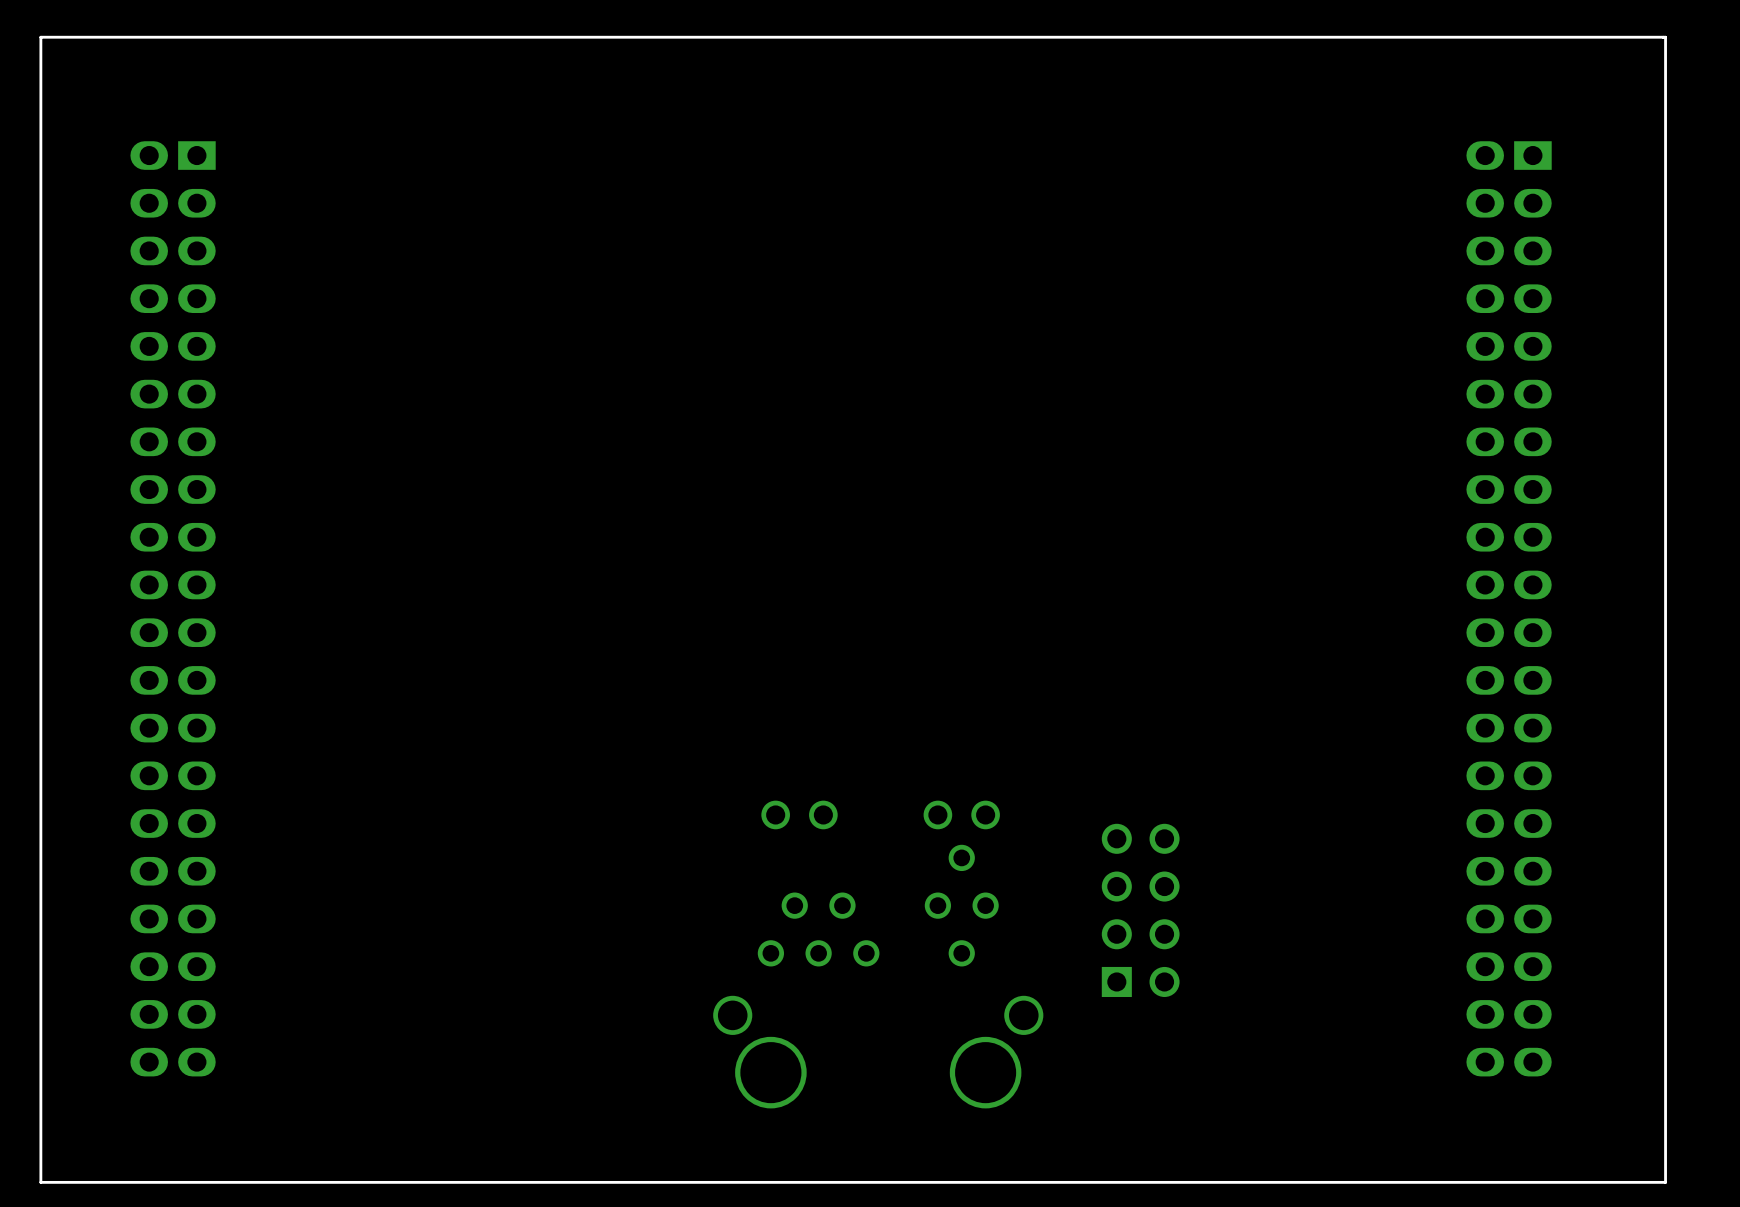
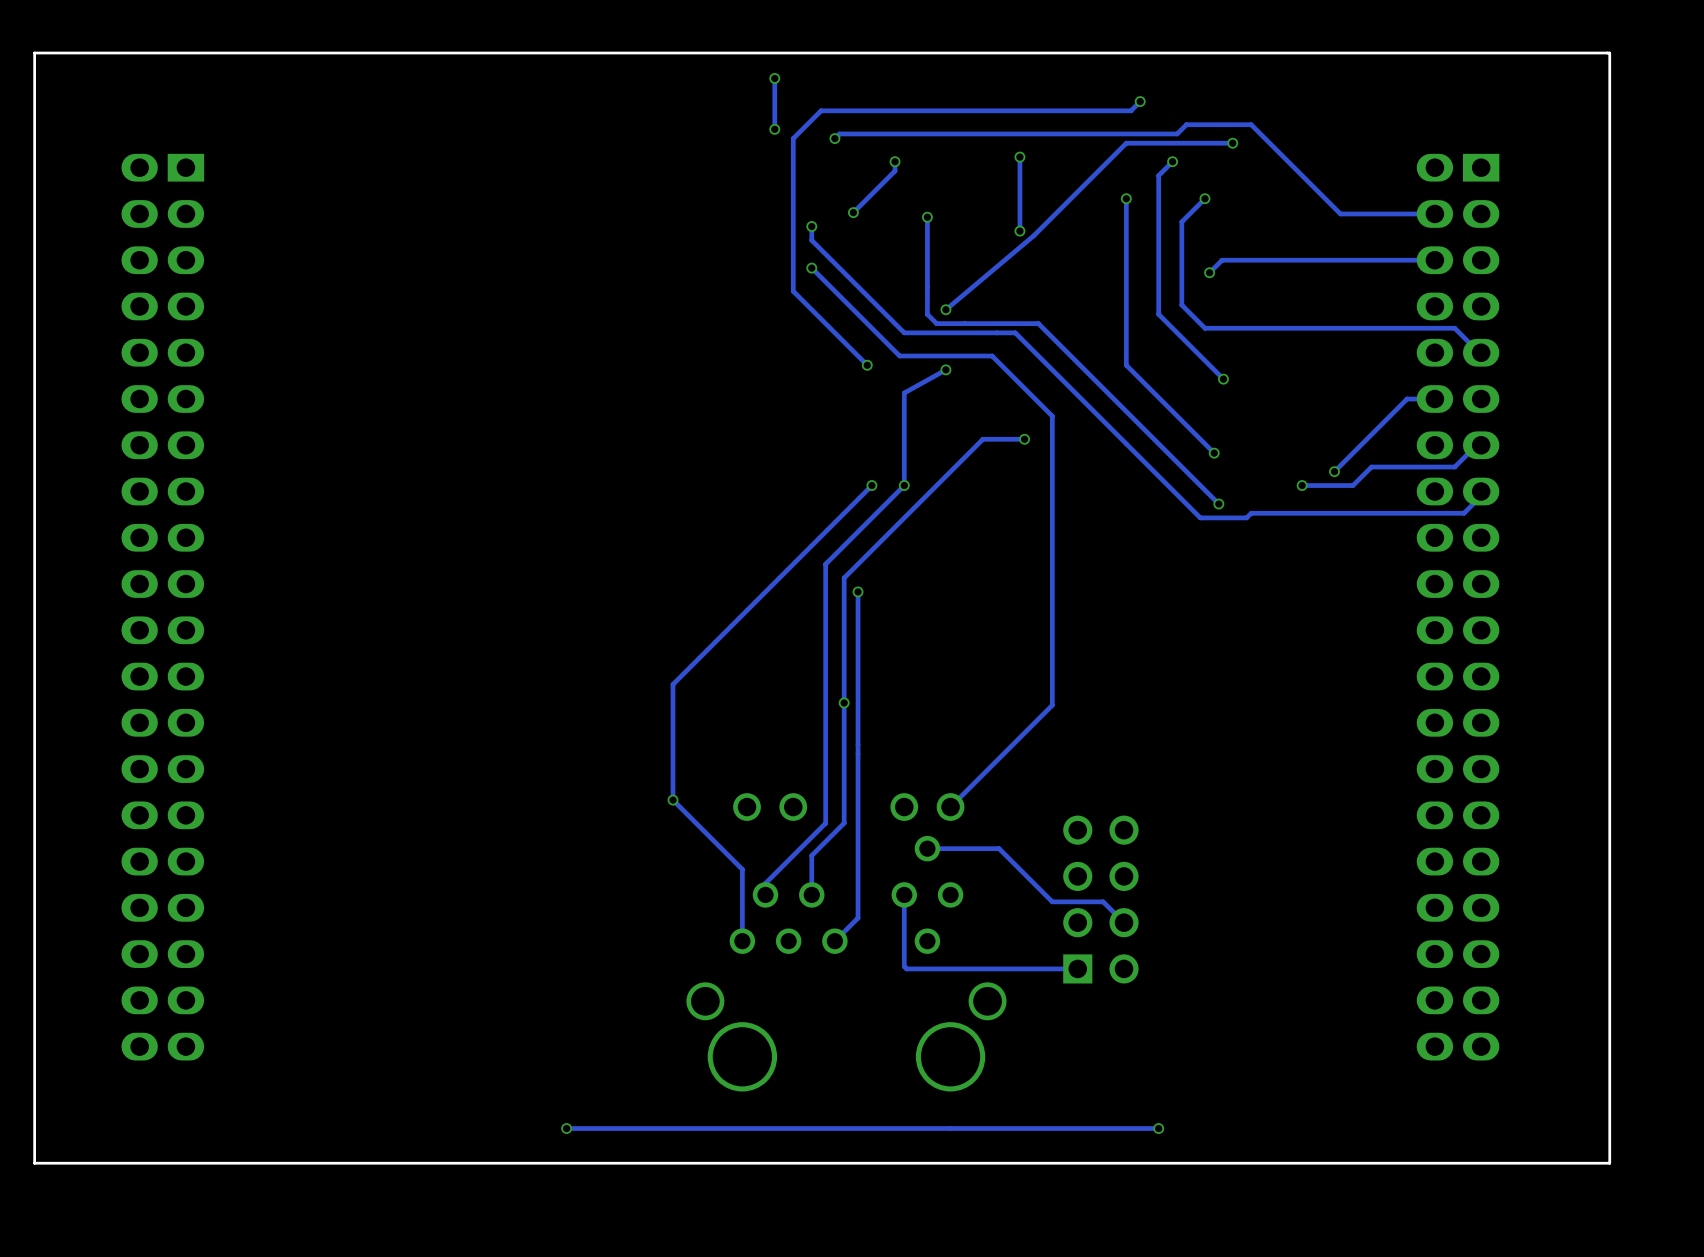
track: none -> (774, 78) (774, 129)
via: none -> (774, 78)
track: none -> (1140, 101) (1130, 110) (821, 110) (793, 138) (793, 291) (867, 365)
via: none -> (1140, 101)
via: none -> (774, 129)
track: none -> (834, 138) (839, 133) (1177, 133) (1186, 124) (1251, 124) (1340, 213) (1434, 213)
via: none -> (834, 138)
track: none -> (1232, 143) (1126, 143) (1033, 235) (945, 309)
via: none -> (1232, 143)
track: none -> (1019, 157) (1019, 231)
via: none -> (1019, 157)
track: none -> (895, 161) (895, 170) (853, 212)
via: none -> (895, 161)
track: none -> (1172, 161) (1158, 175) (1158, 314) (1223, 379)
via: none -> (1172, 161)
track: none -> (1126, 198) (1126, 365) (1214, 453)
via: none -> (1126, 198)
track: none -> (1204, 198) (1181, 221) (1181, 305) (1204, 328) (1454, 328) (1481, 352)
via: none -> (1204, 198)
via: none -> (853, 212)
track: none -> (927, 217) (927, 314) (936, 323) (1038, 323) (1218, 504)
via: none -> (927, 217)
track: none -> (811, 226) (811, 240) (904, 332) (1015, 332) (1200, 517) (1246, 517) (1251, 513) (1464, 513) (1481, 496) (1481, 491)
via: none -> (811, 226)
via: none -> (1019, 231)
track: none -> (1434, 260) (1222, 260) (1209, 272)
track: none -> (811, 268) (899, 356) (992, 356) (1052, 416) (1052, 705) (950, 807)
via: none -> (811, 268)
via: none -> (1209, 272)
via: none -> (945, 309)
via: none -> (867, 365)
track: none -> (945, 369) (904, 393) (904, 485) (825, 564) (825, 823) (765, 883) (765, 894)
via: none -> (945, 369)
via: none -> (1223, 379)
track: none -> (1434, 399) (1407, 399) (1334, 471)
track: none -> (1024, 439) (982, 439) (844, 578) (844, 823) (811, 855) (811, 894)
via: none -> (1024, 439)
track: none -> (1481, 445) (1476, 445) (1454, 467) (1371, 467) (1353, 485) (1302, 485)
via: none -> (1214, 453)
via: none -> (1334, 471)
track: none -> (871, 485) (673, 684) (673, 800) (742, 869) (742, 941)
via: none -> (871, 485)
via: none -> (904, 485)
via: none -> (1302, 485)
via: none -> (1218, 504)
track: none -> (858, 591) (858, 918) (834, 941)
via: none -> (858, 591)
via: none -> (844, 702)
via: none -> (673, 800)
track: none -> (927, 848) (999, 848) (1052, 901) (1103, 901) (1124, 922)
track: none -> (904, 894) (904, 966) (906, 968) (1077, 968)
via: none -> (566, 1128)
track: none -> (1158, 1128) (566, 1128)
via: none -> (1158, 1128)

